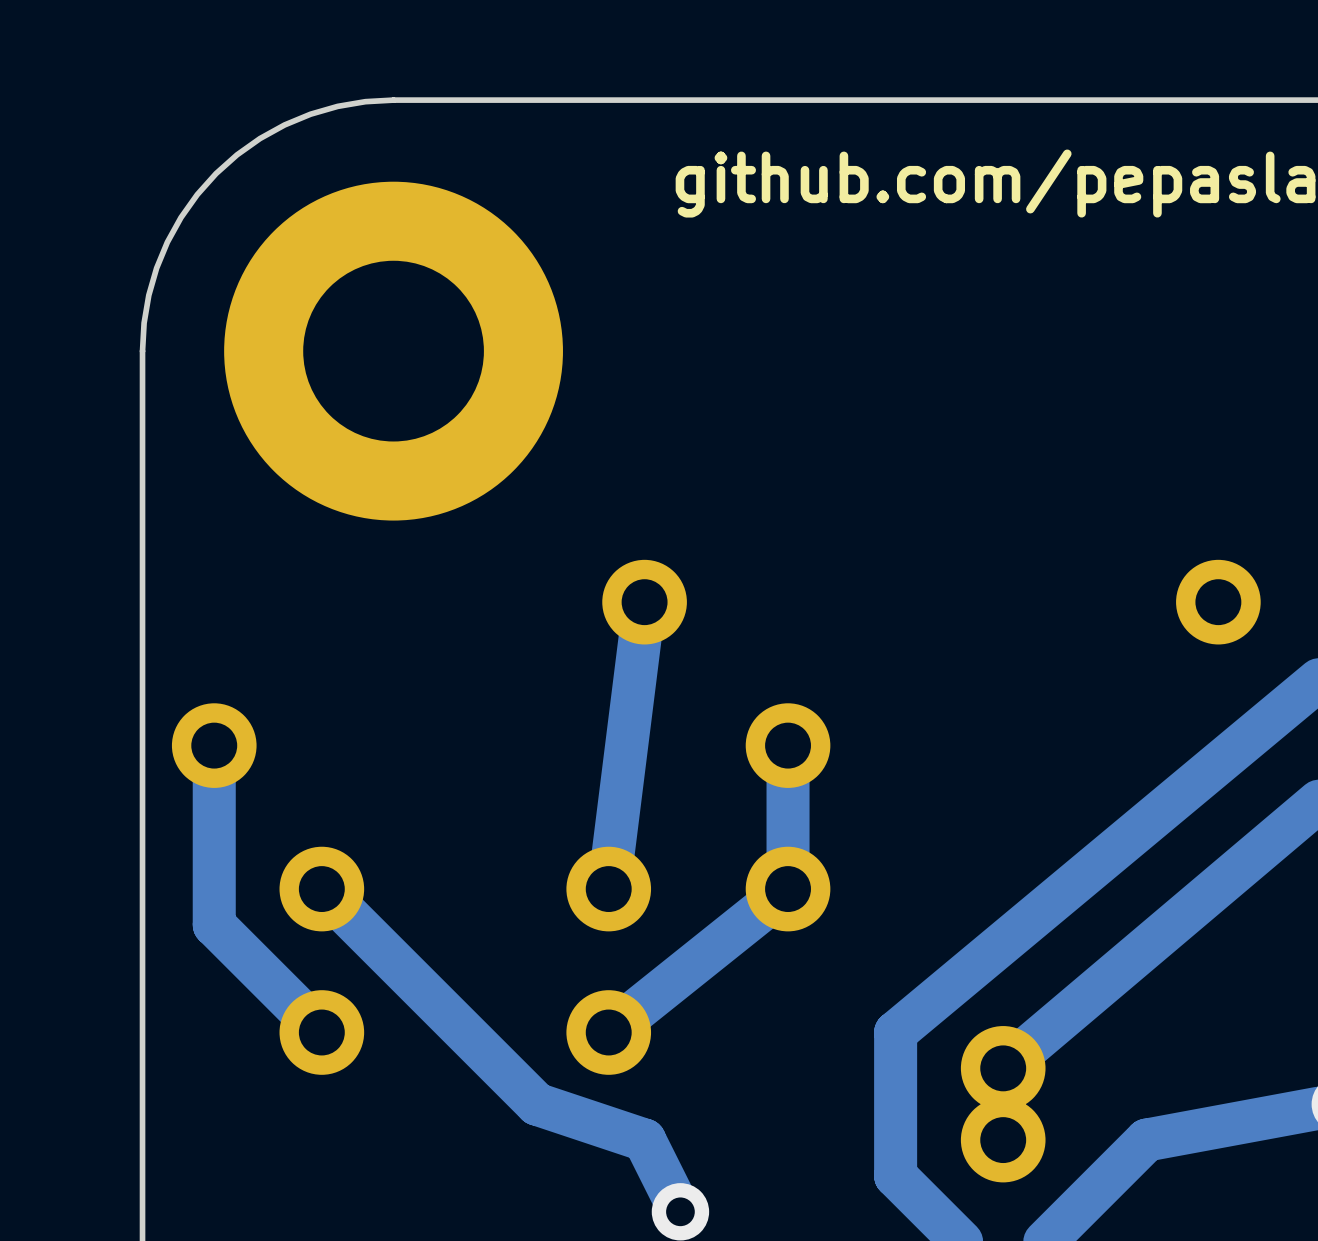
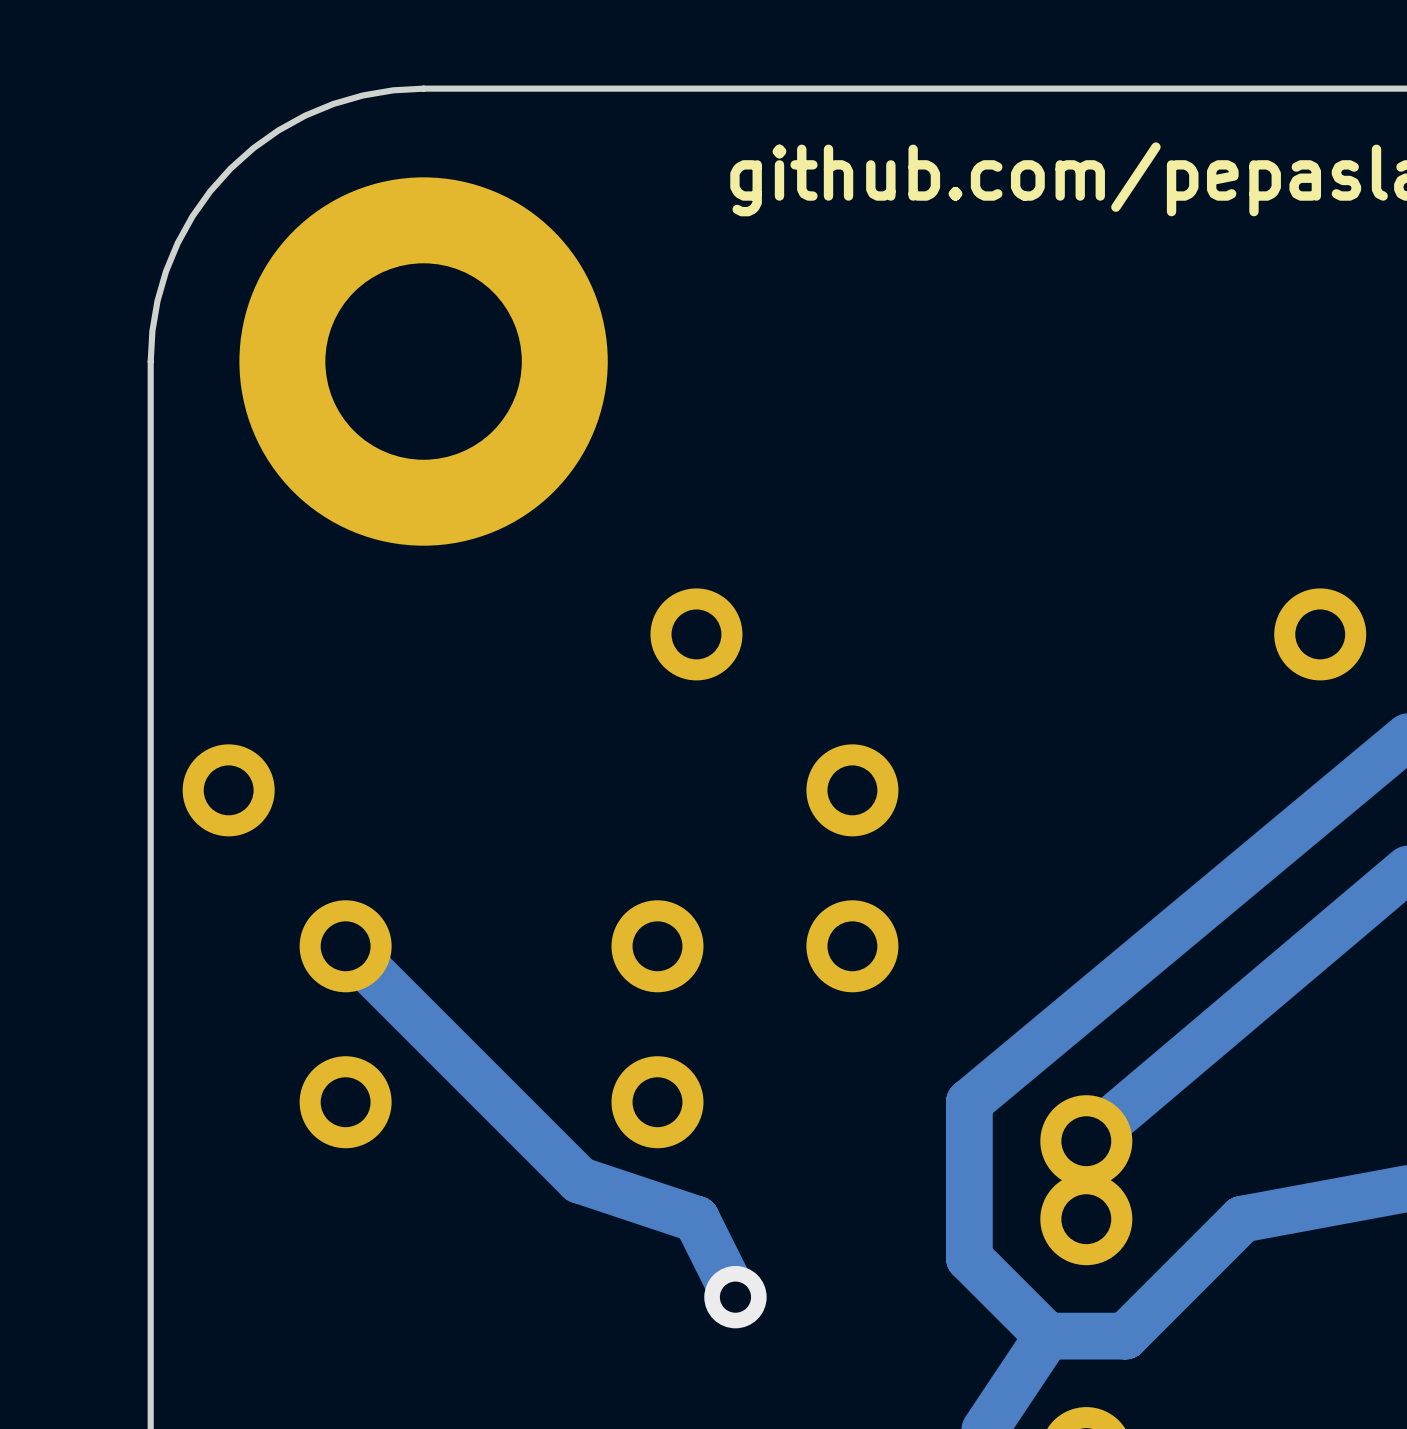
track: (644, 602) (608, 889) -> none
track: (214, 745) (214, 924) (321, 1032) -> none
track: (788, 745) (788, 889) (608, 1032) -> none

